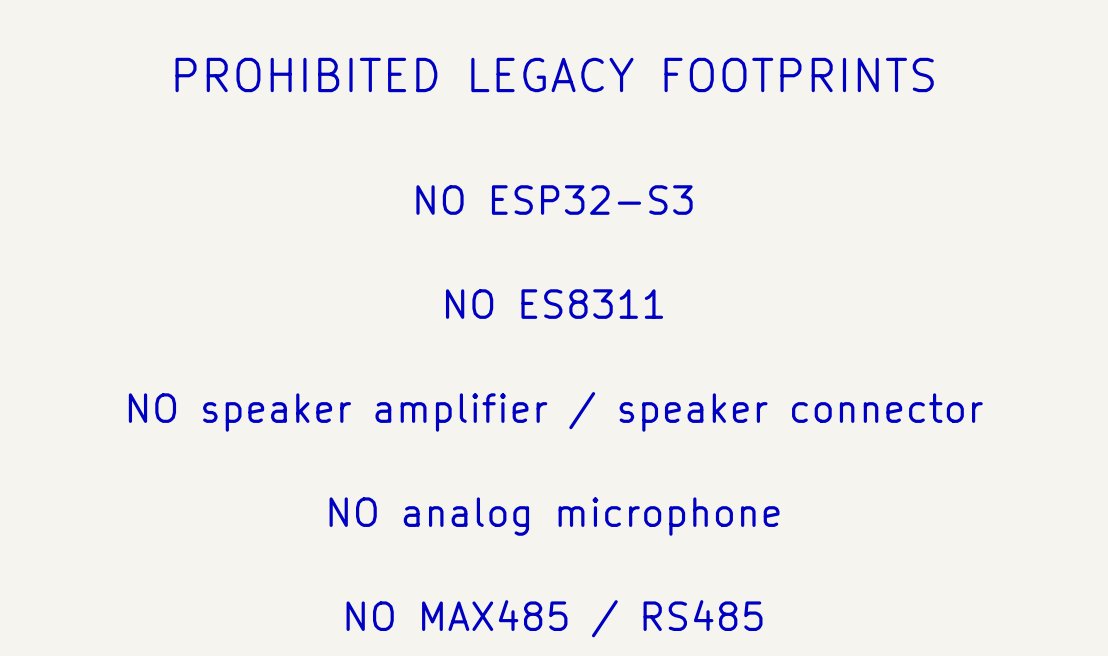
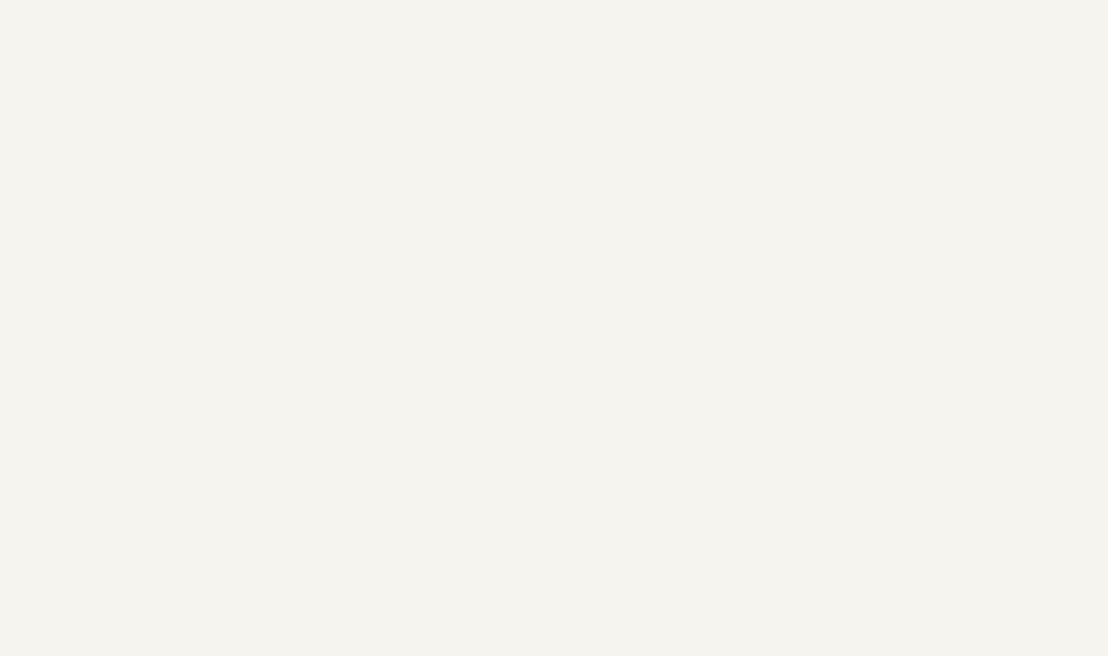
text: PROHIBITED LEGACY FOOTPRINTS (554, 74) -> none
text: NO ESP32-S3 (554, 200) -> none
text: NO ES8311 (554, 304) -> none
text: NO speaker amplifier / speaker connector (555, 411) -> none
text: NO analog microphone (554, 516) -> none
text: NO MAX485 / RS485 (554, 618) -> none

